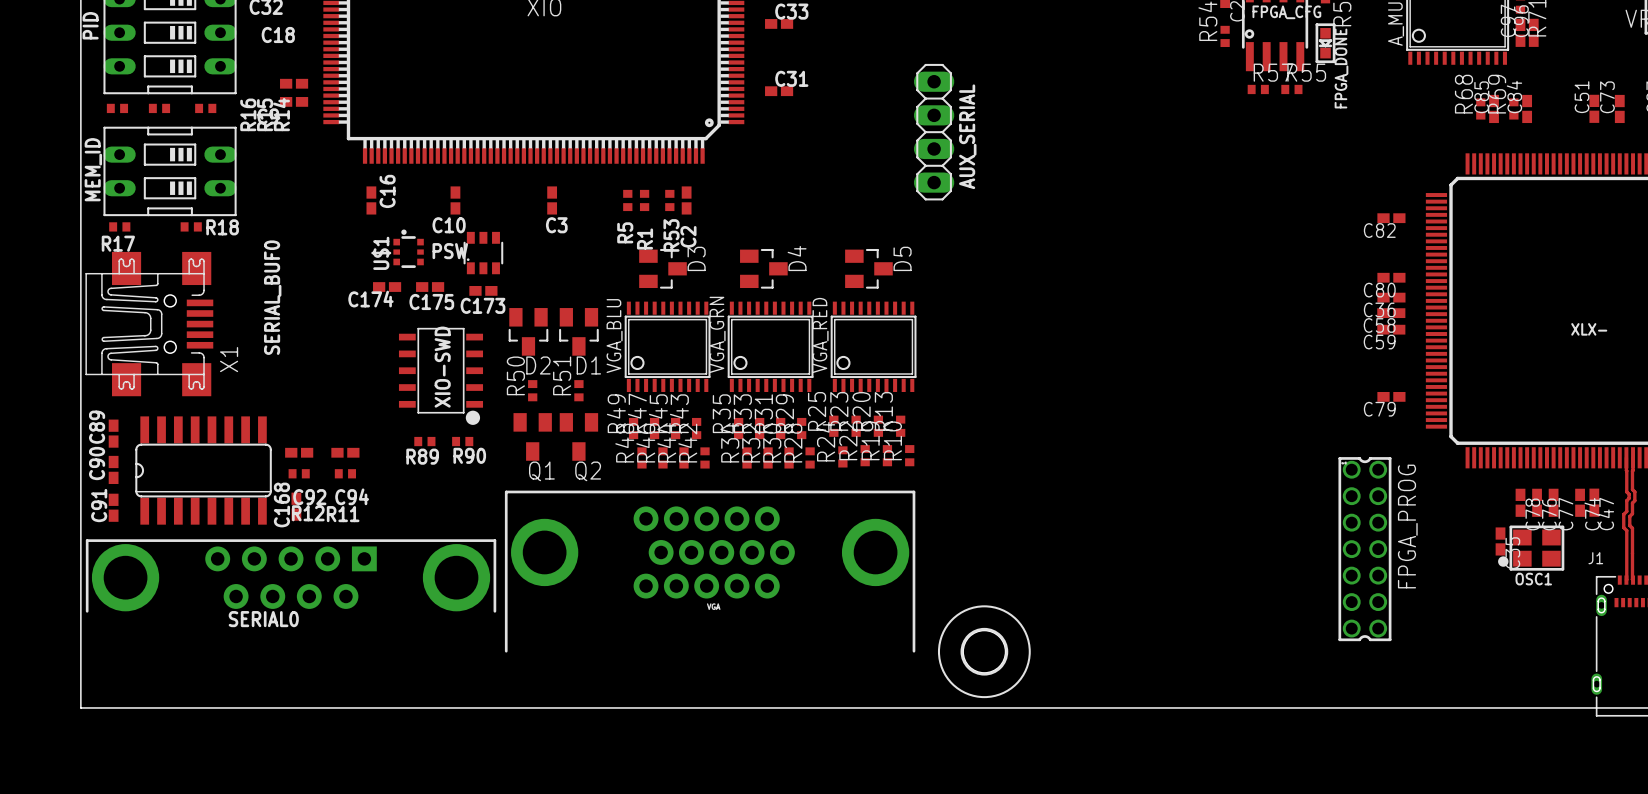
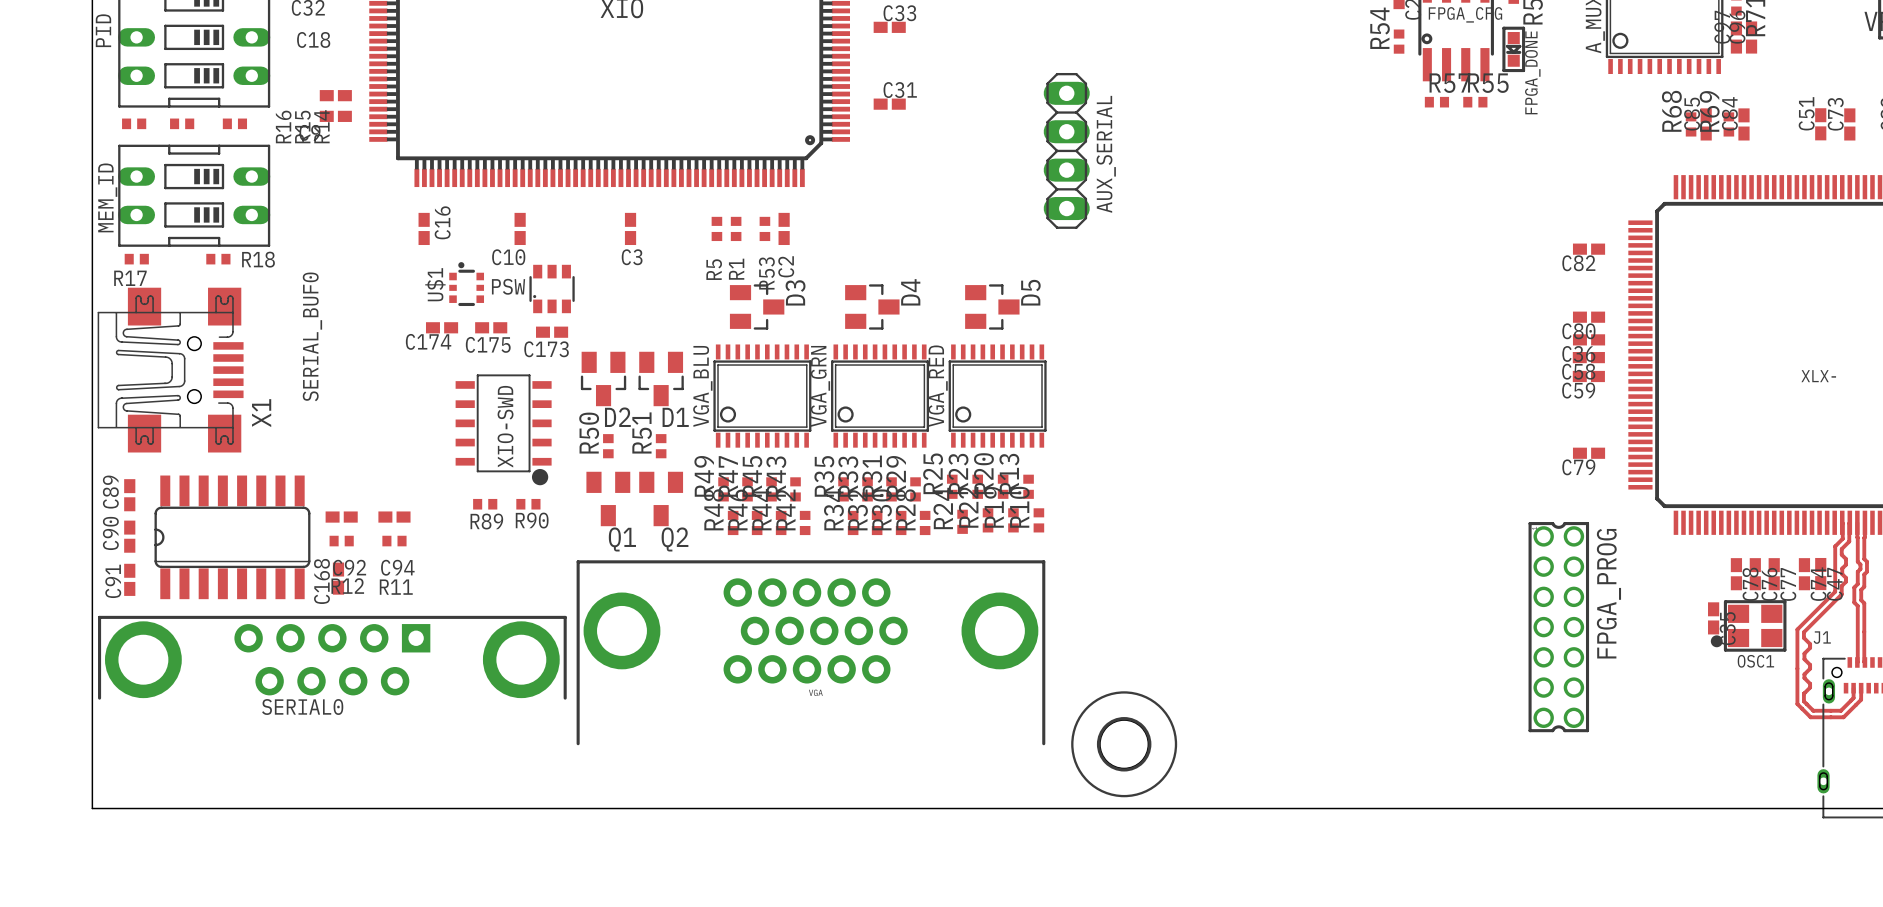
top track: none -> (1842, 522) (1842, 538) (1835, 546) (1835, 591) (1797, 629) (1797, 704) (1810, 717) (1843, 717) (1861, 699) (1861, 688)
top track: none -> (1849, 522) (1849, 541) (1841, 549) (1841, 554) (1846, 559) (1846, 564) (1842, 568) (1842, 574) (1846, 577) (1846, 581) (1841, 586) (1841, 594) (1803, 632) (1803, 637) (1810, 644) (1810, 647) (1804, 653) (1804, 659) (1810, 664) (1804, 678) (1810, 683) (1810, 687) (1803, 693) (1803, 701) (1813, 710) (1840, 710) (1853, 698) (1853, 688)

